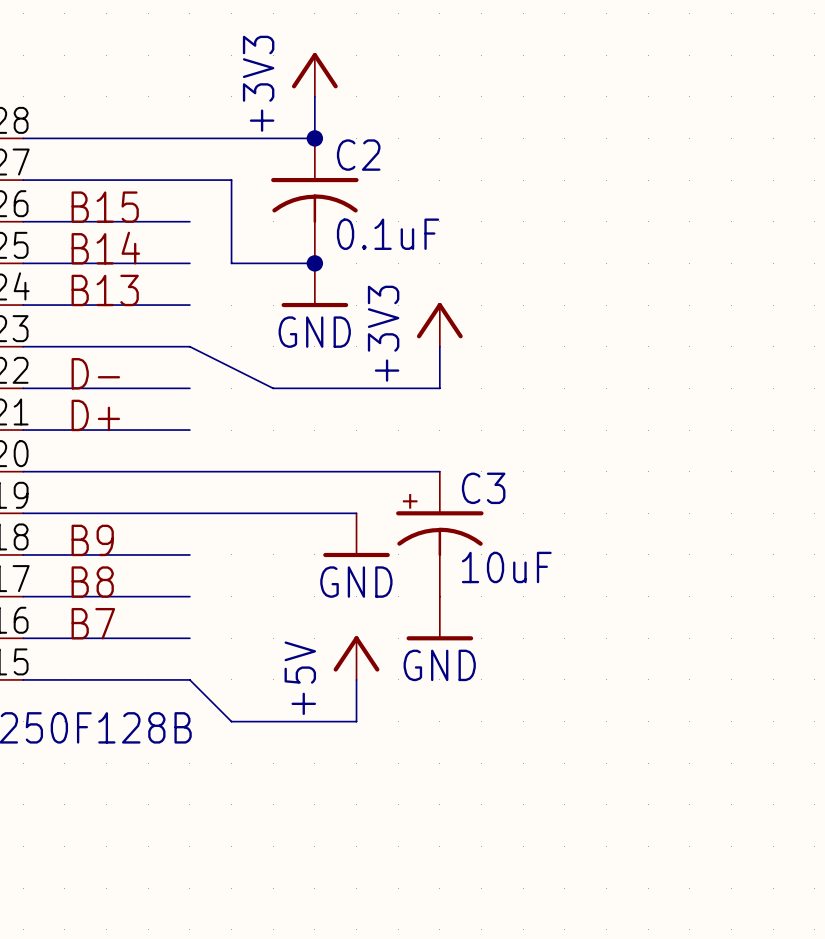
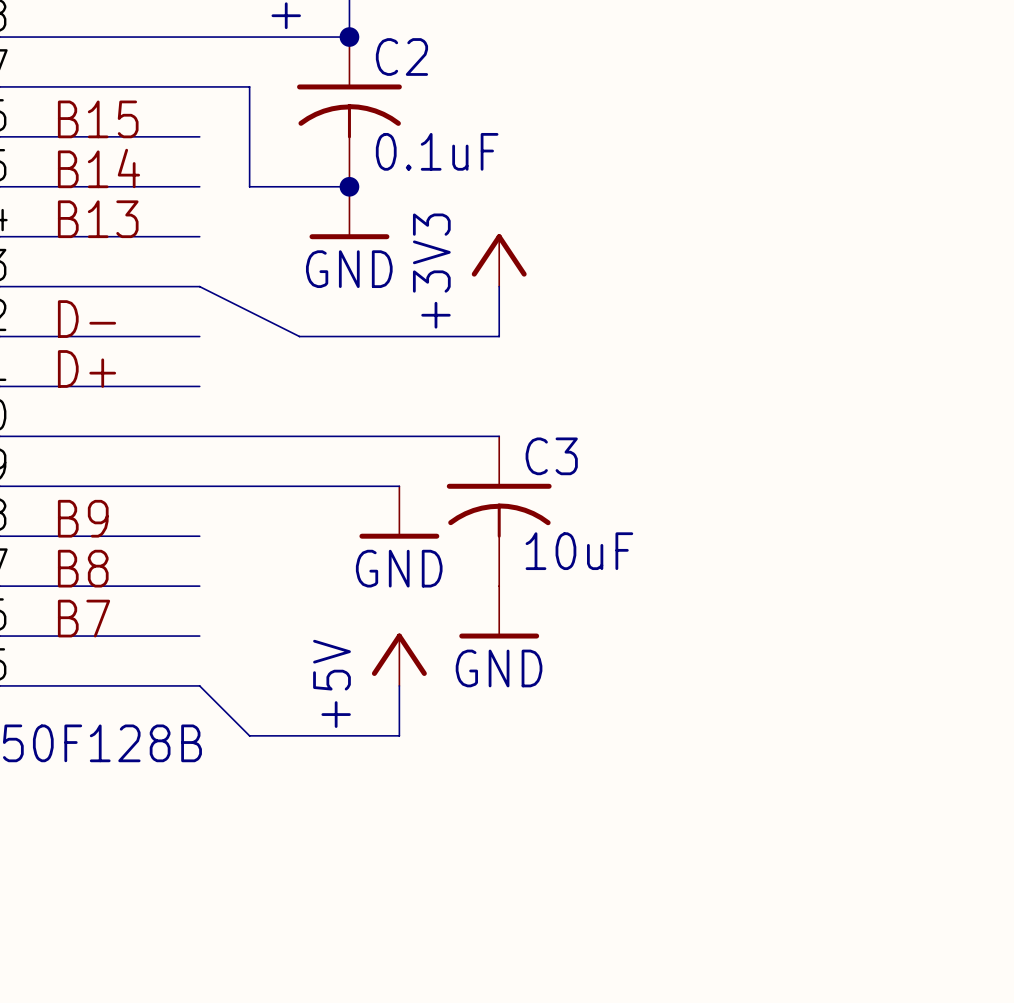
C3 symbol: [396, 471, 484, 597] -> [446, 436, 552, 587]

